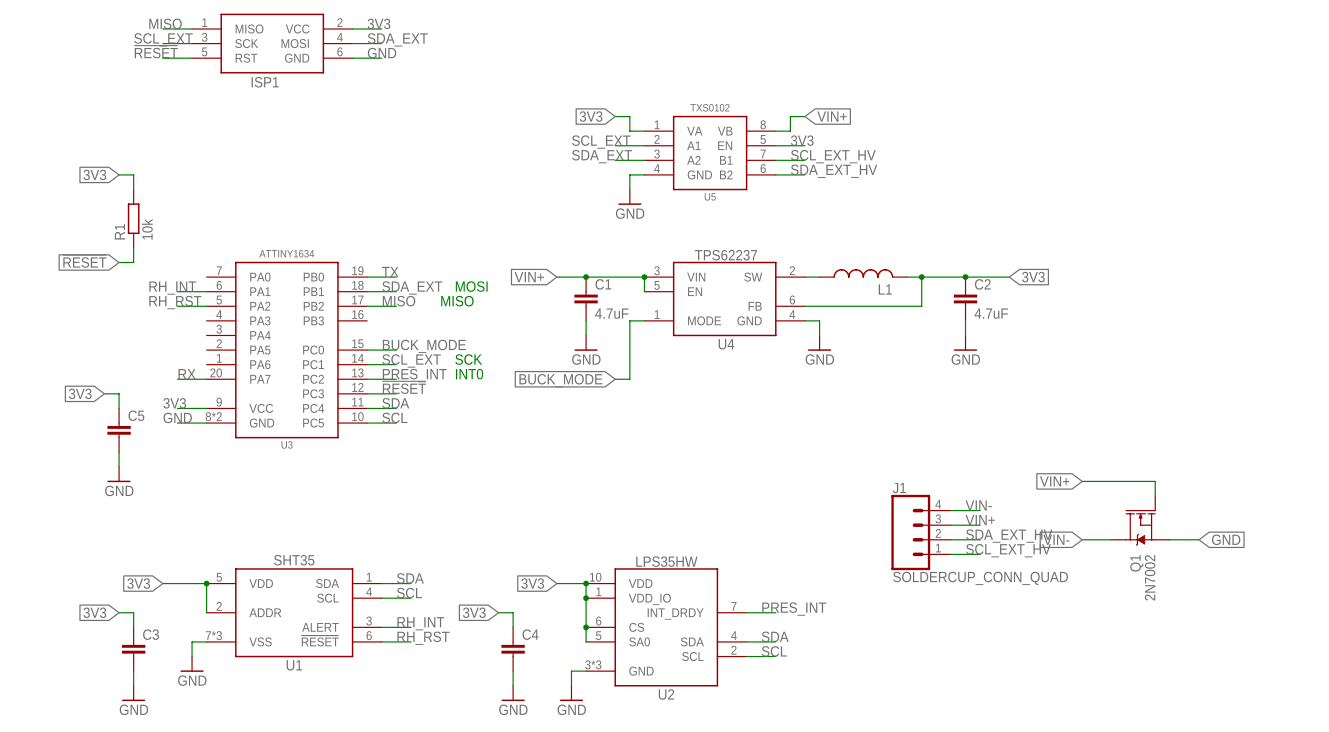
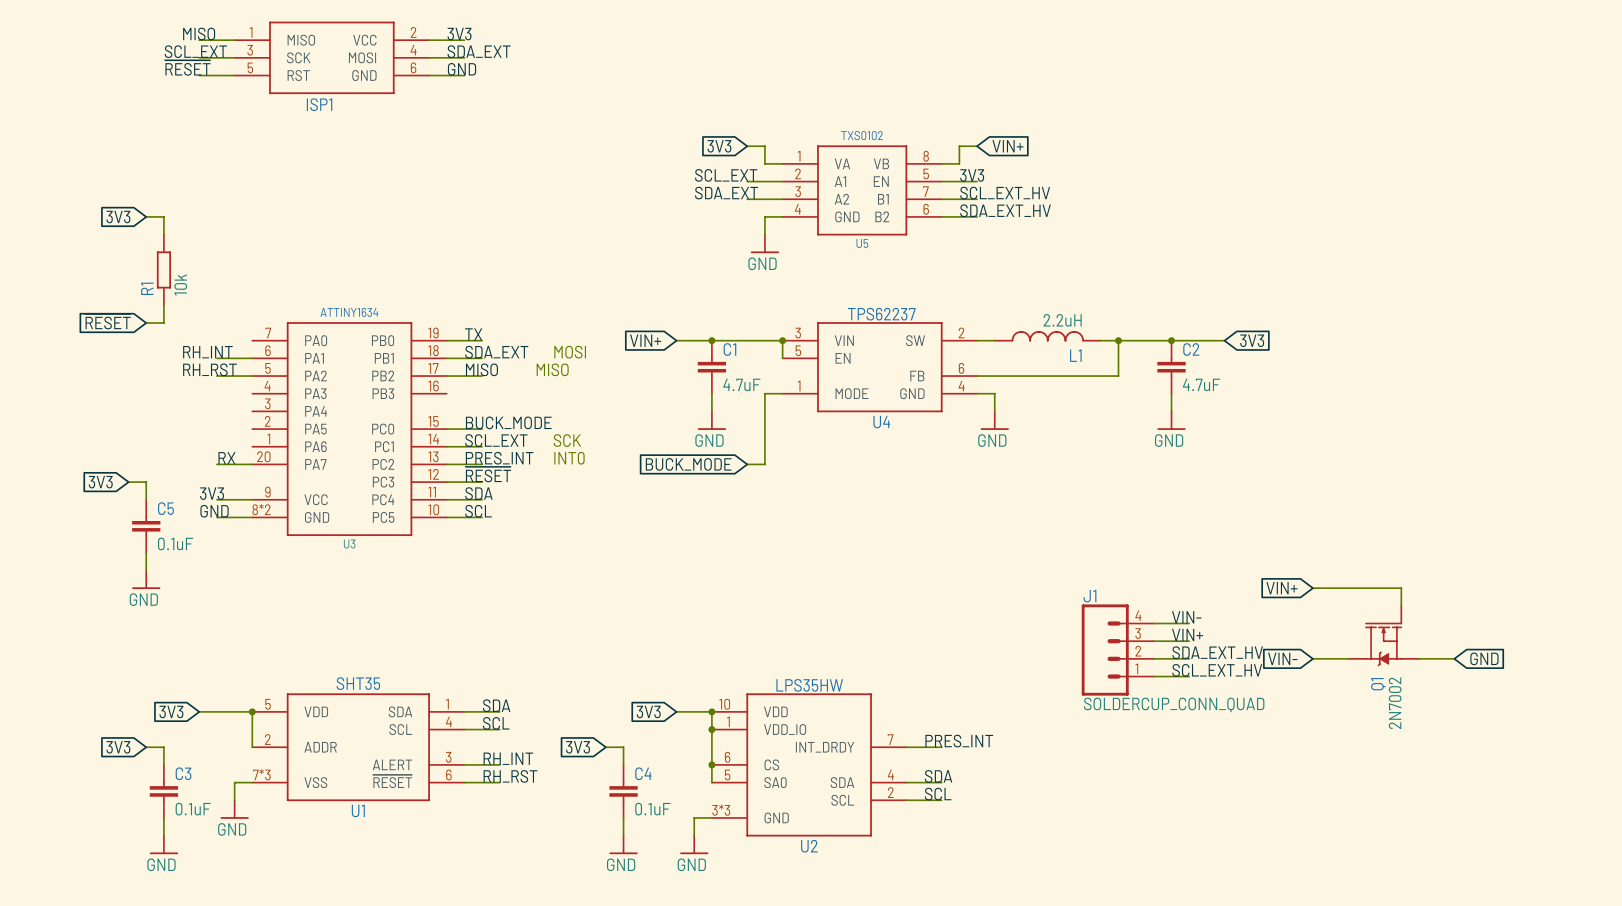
L1 value: none -> 2.2uH (1062, 320)
C5 value: none -> 0.1uF (175, 543)
C3 value: none -> 0.1uF (193, 809)
C4 value: none -> 0.1uF (652, 809)

